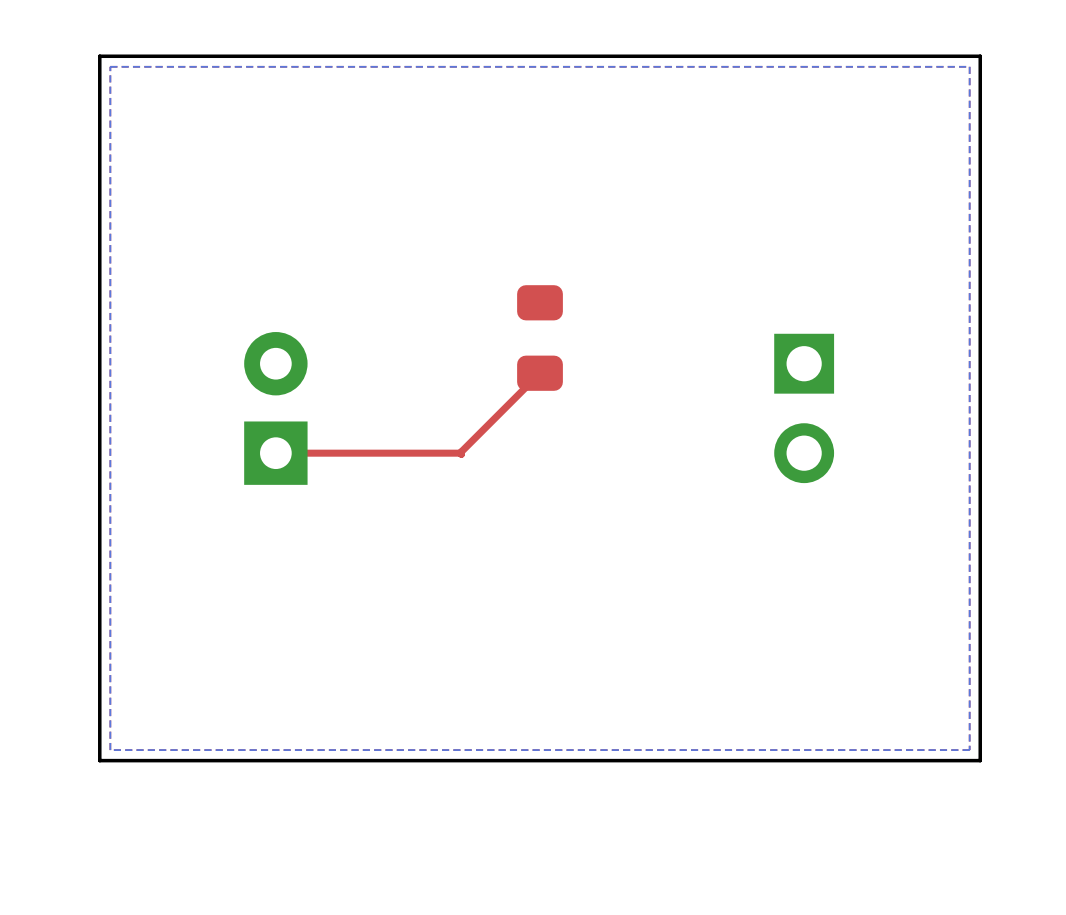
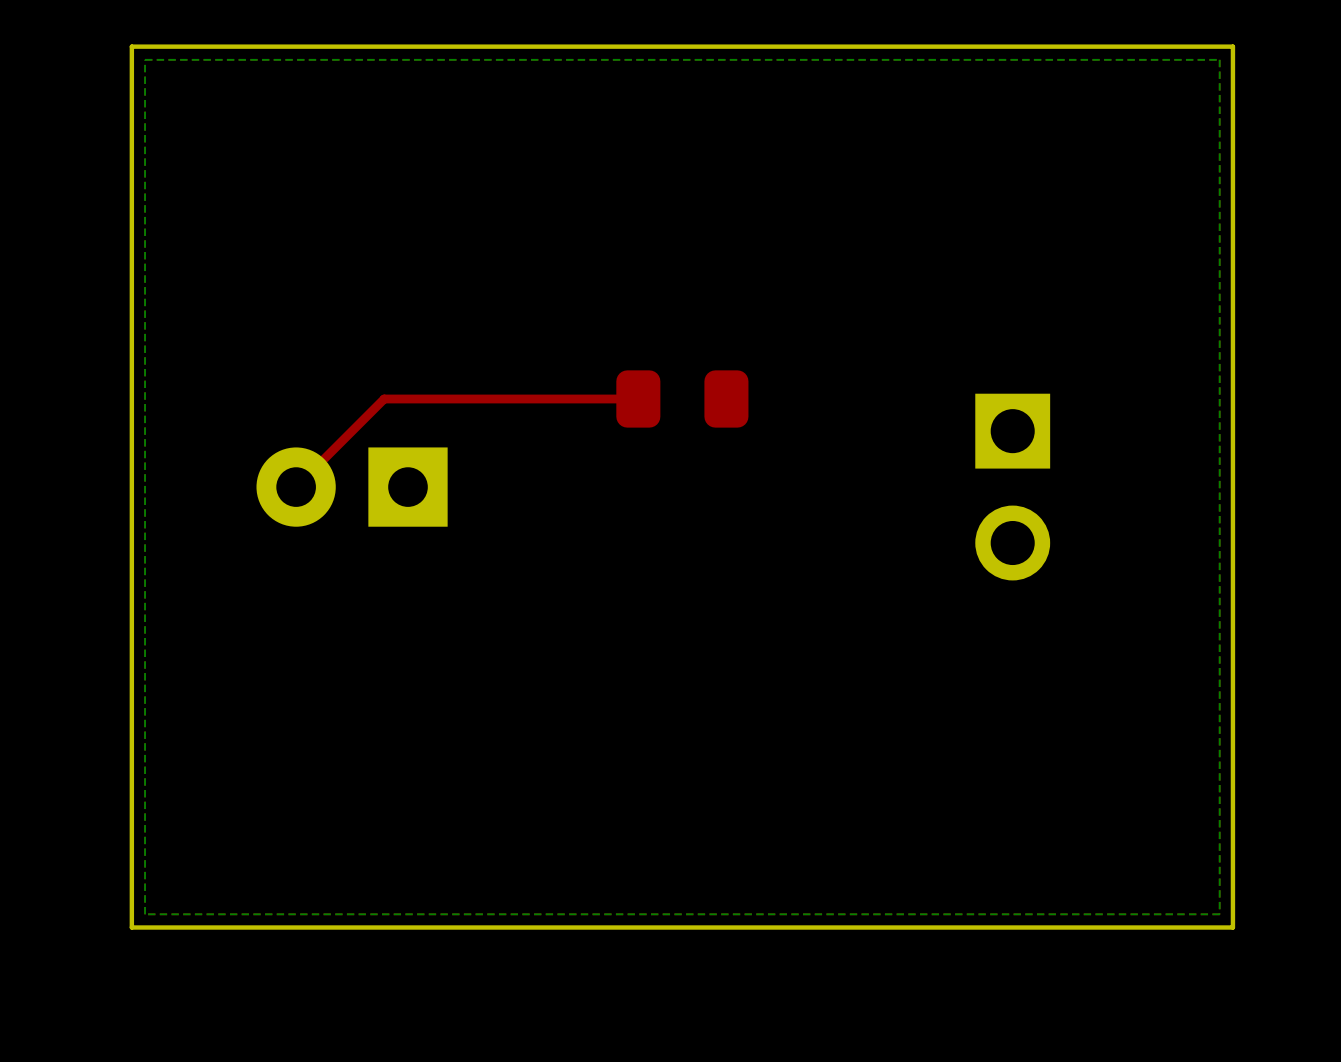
top track: none -> (638, 398) (384, 398) (296, 487)
part rotation: 0° (540, 338) -> 90° clockwise (682, 398)
top track: (540, 373) (461, 451) (461, 454) (275, 453) -> none
part rotation: 0° (275, 408) -> 90° counterclockwise (352, 487)

